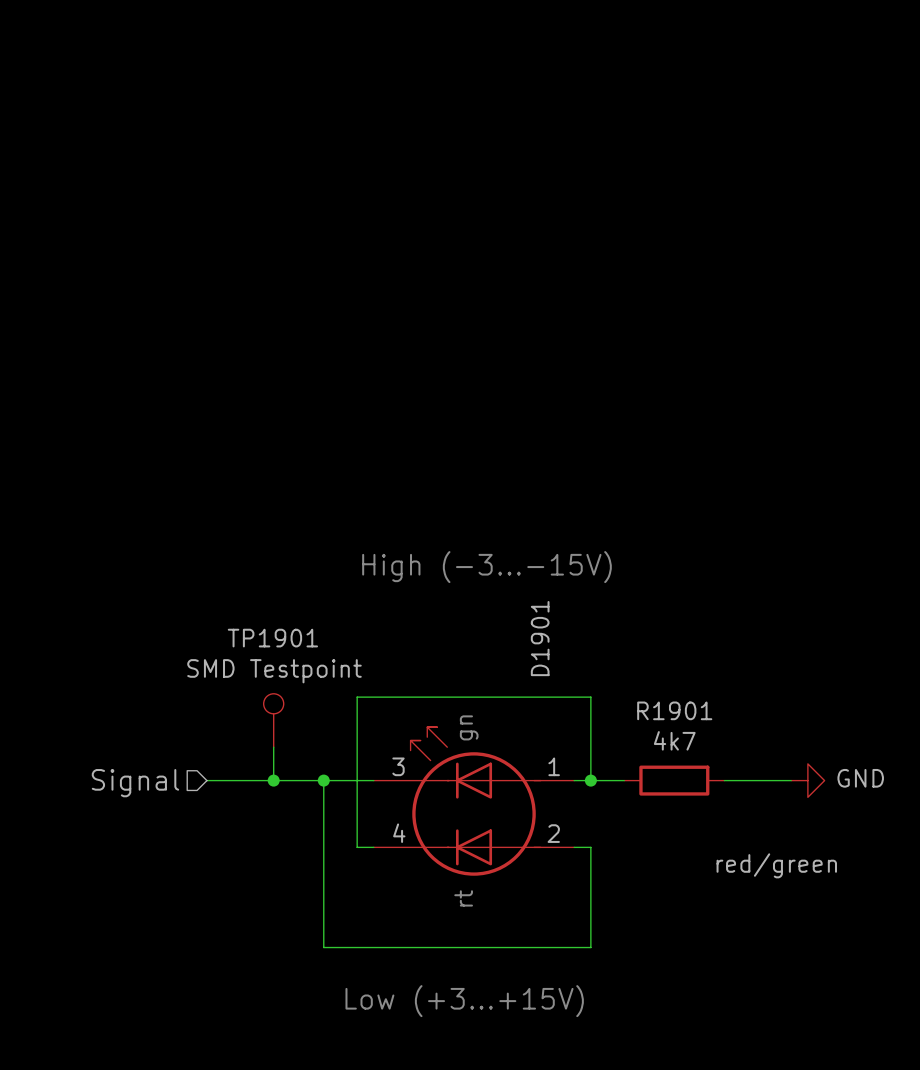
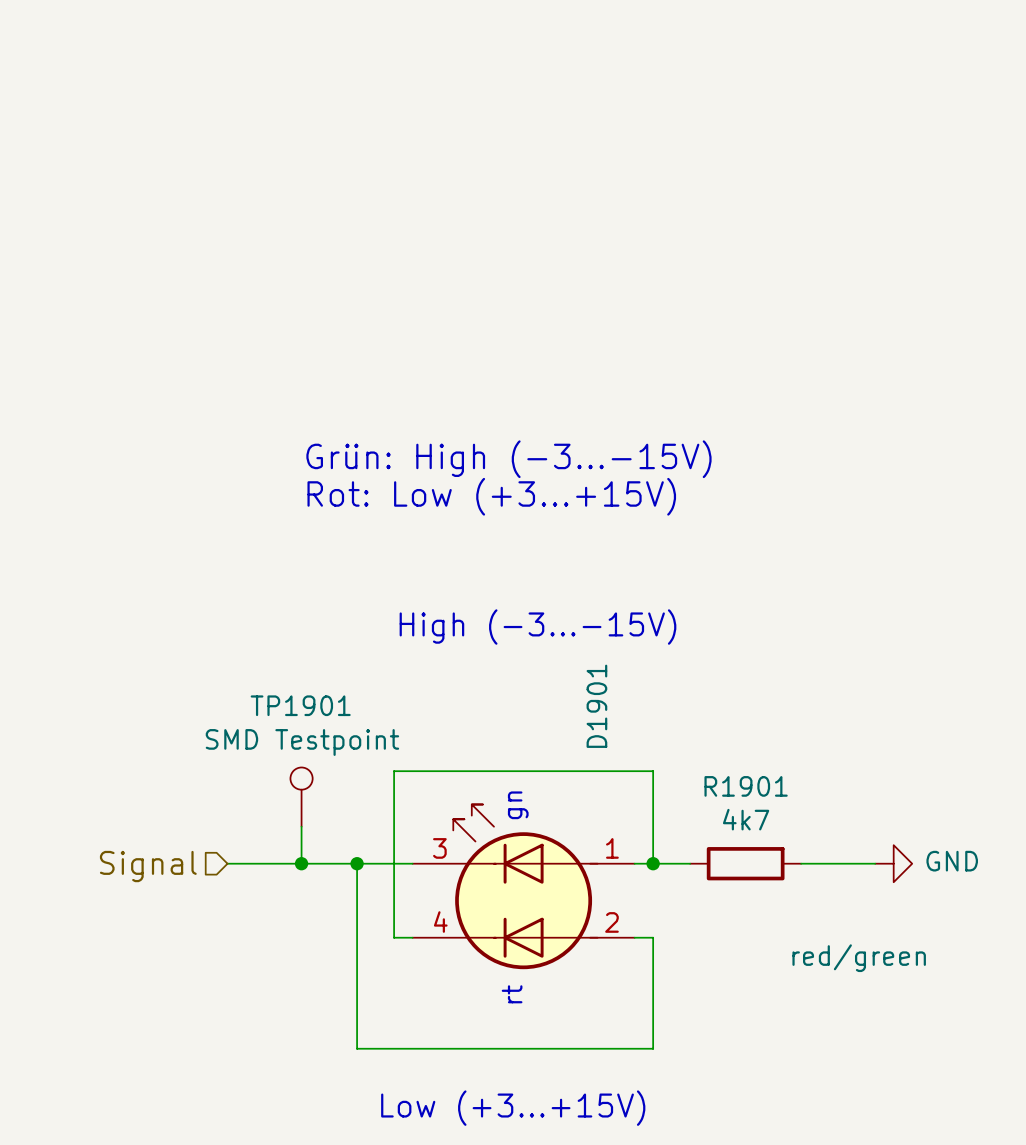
text: none -> Grün: High (-3...-15V) (508, 459)
text: none -> Rot: Low (+3...+15V) (491, 496)

